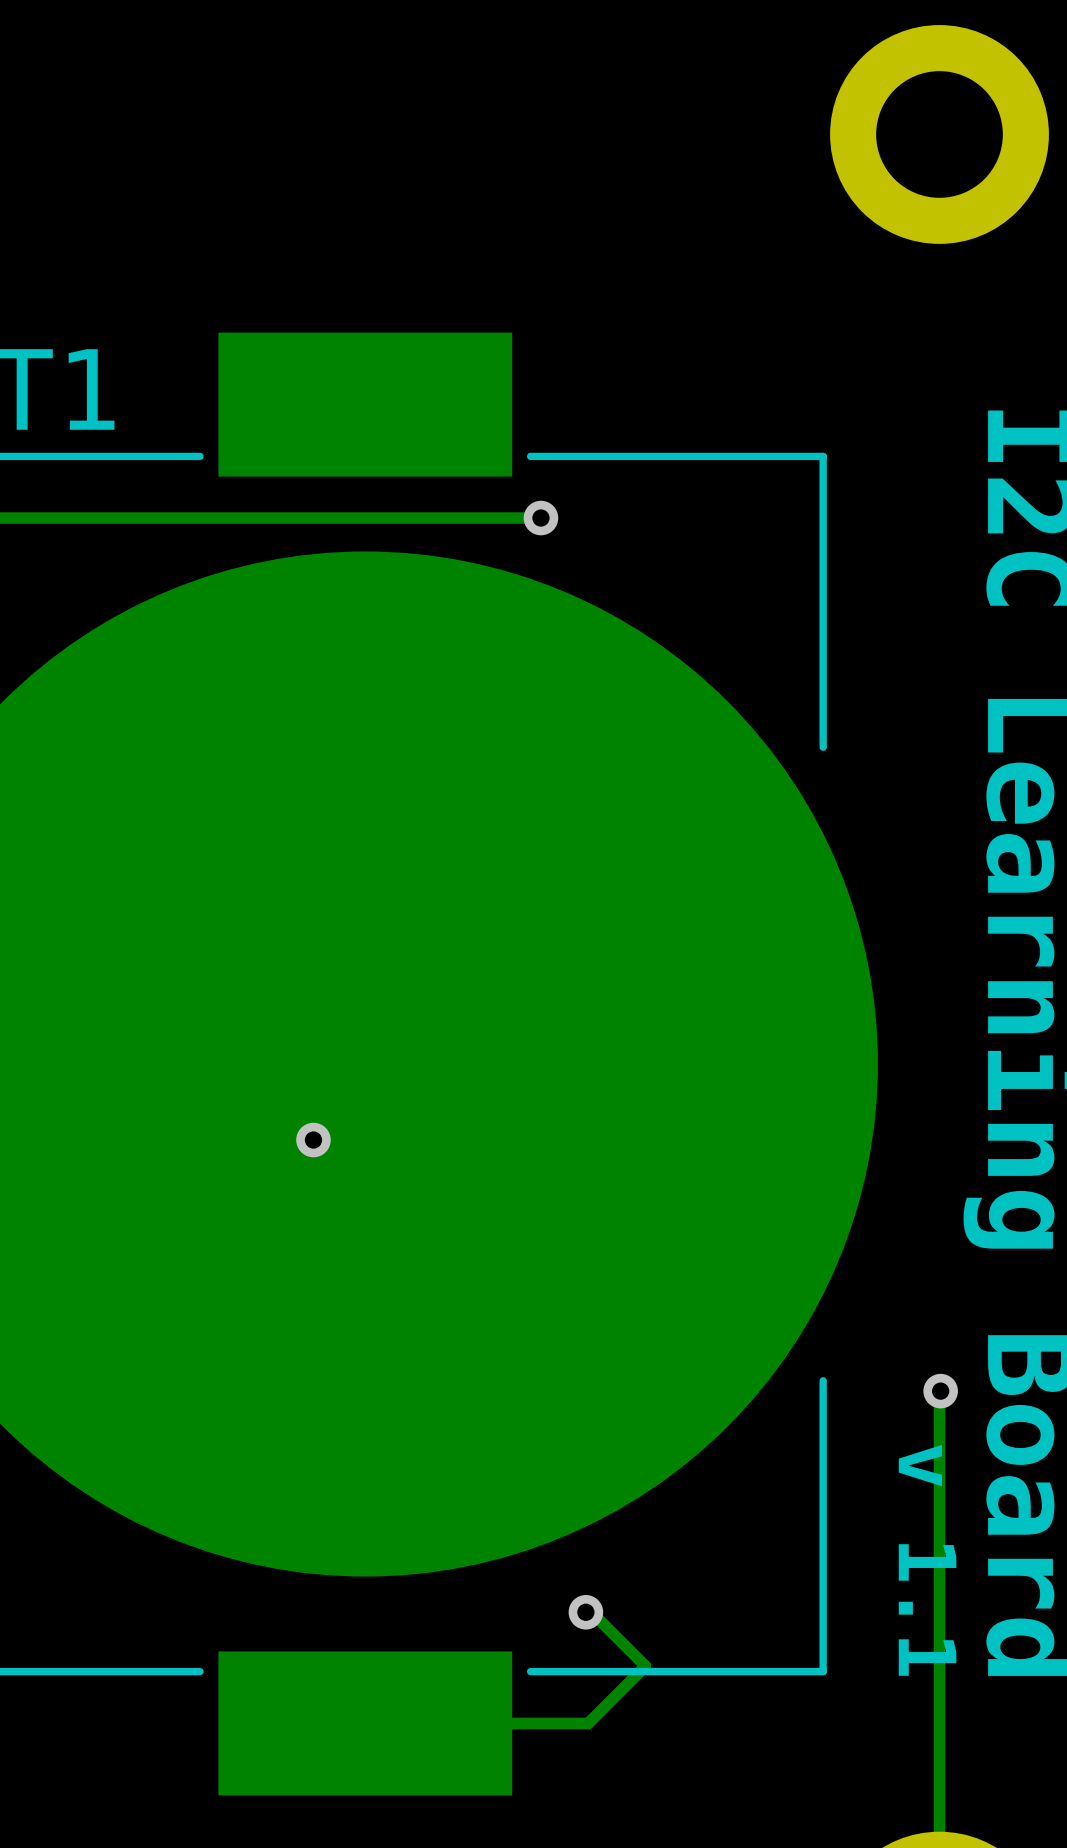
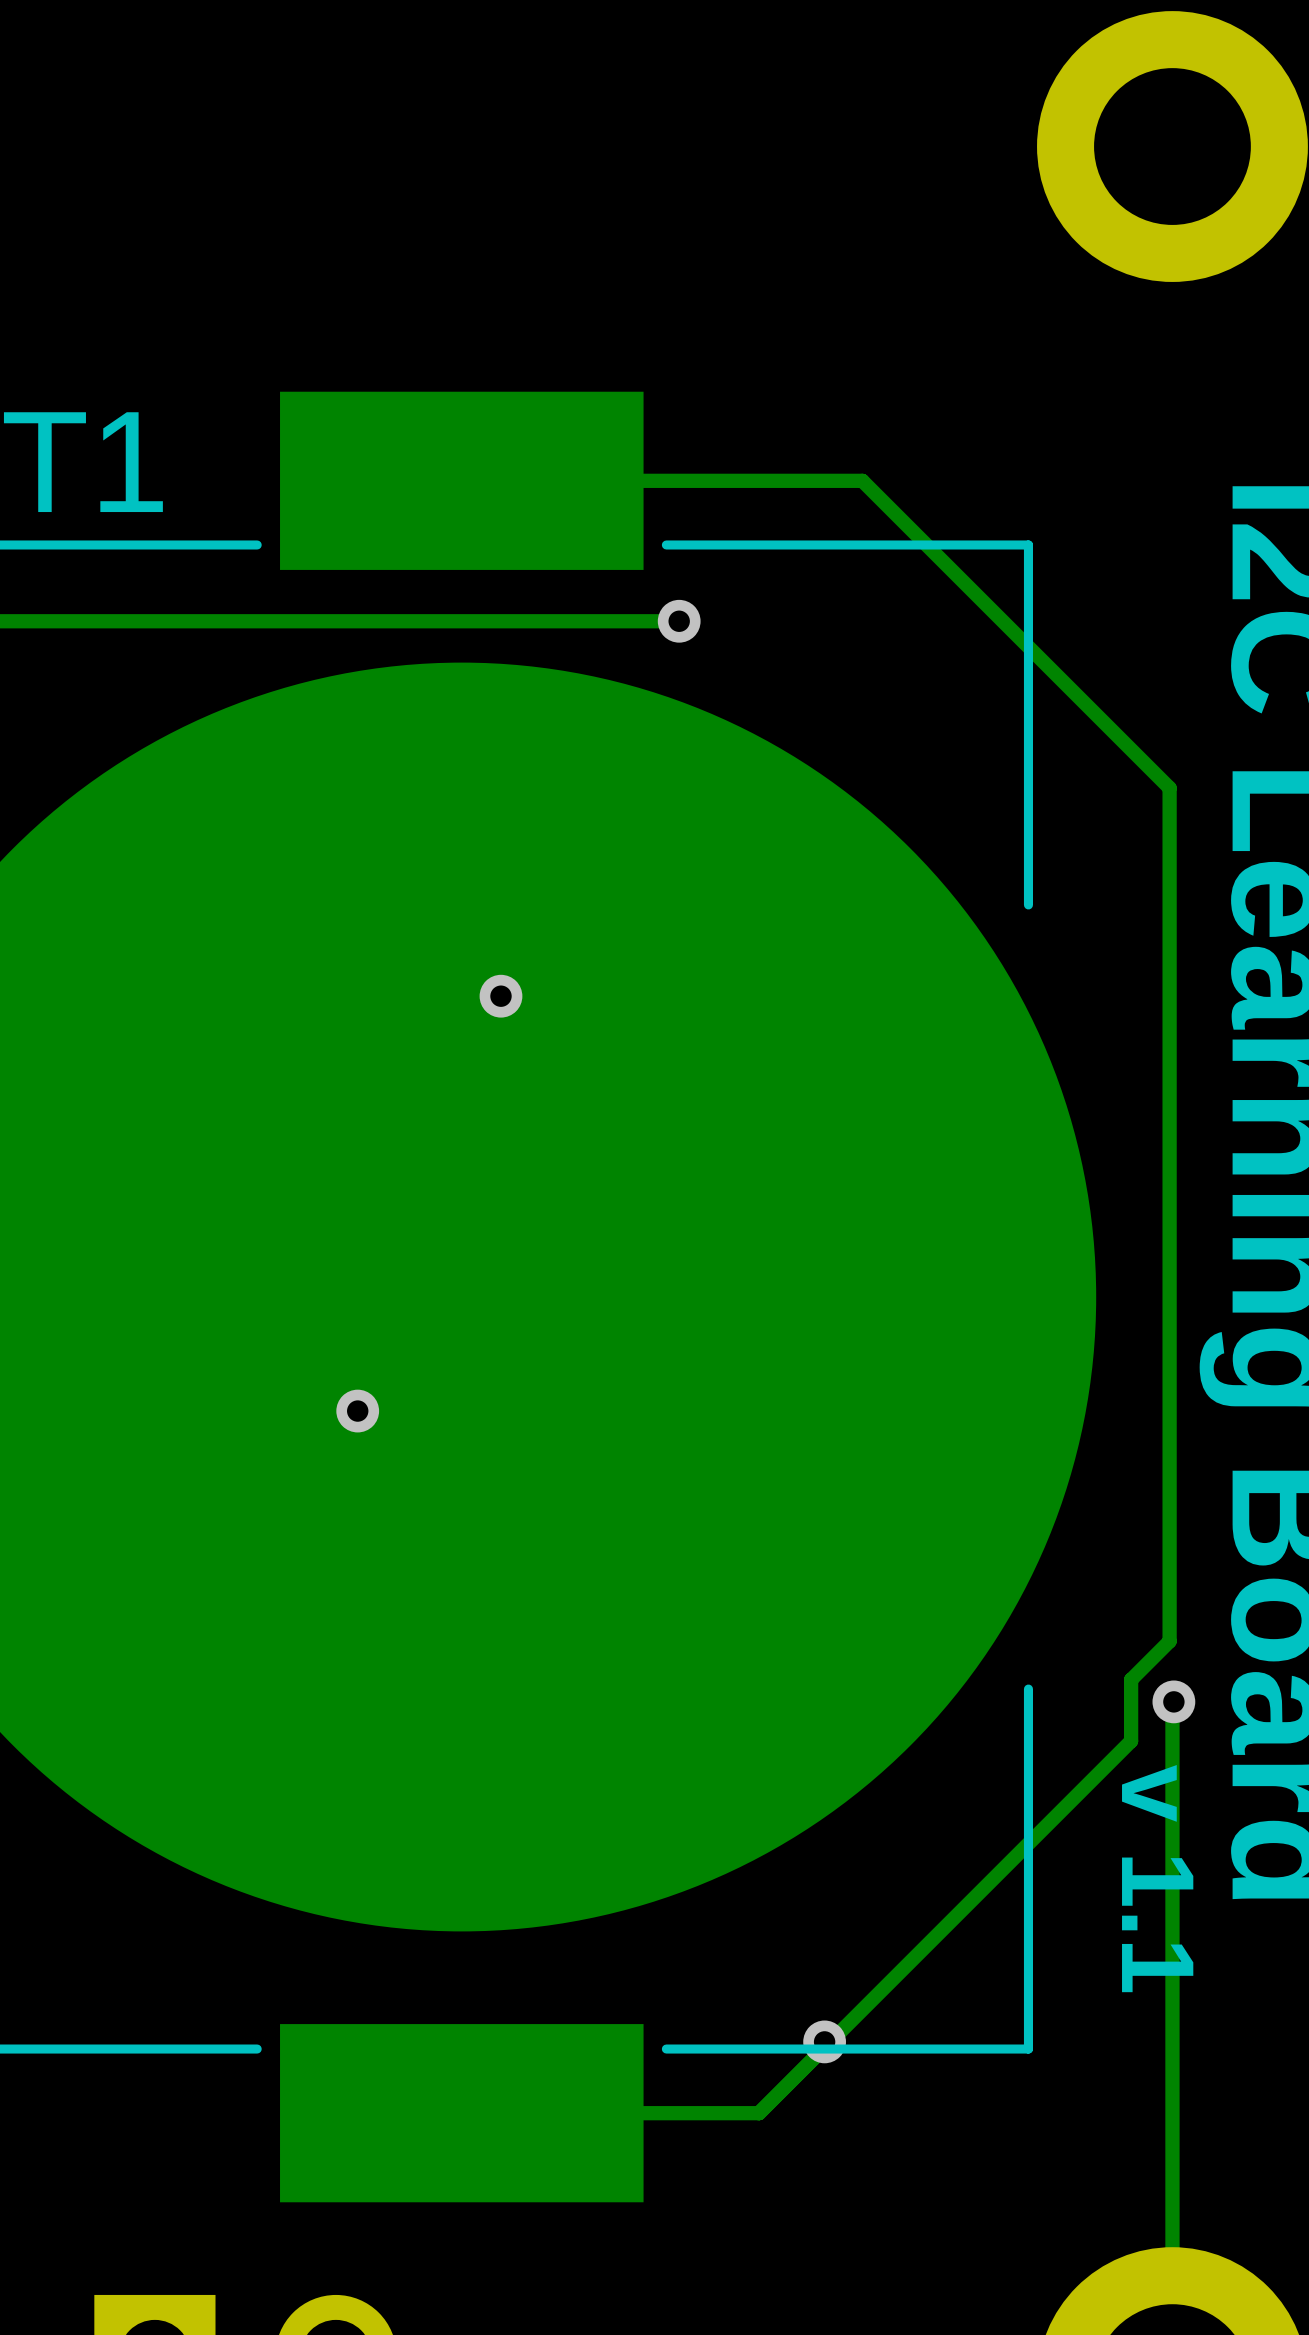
via: none -> (500, 996)
via position: (313, 1140) -> (357, 1411)
track: (585, 1612) (591, 1612) (645, 1665) -> none
via position: (585, 1612) -> (824, 2041)
track: (645, 1666) (588, 1723) -> (461, 480) (862, 480) (1169, 788) (1169, 1641) (1131, 1679) (1131, 1741) (759, 2113) (737, 2113)

